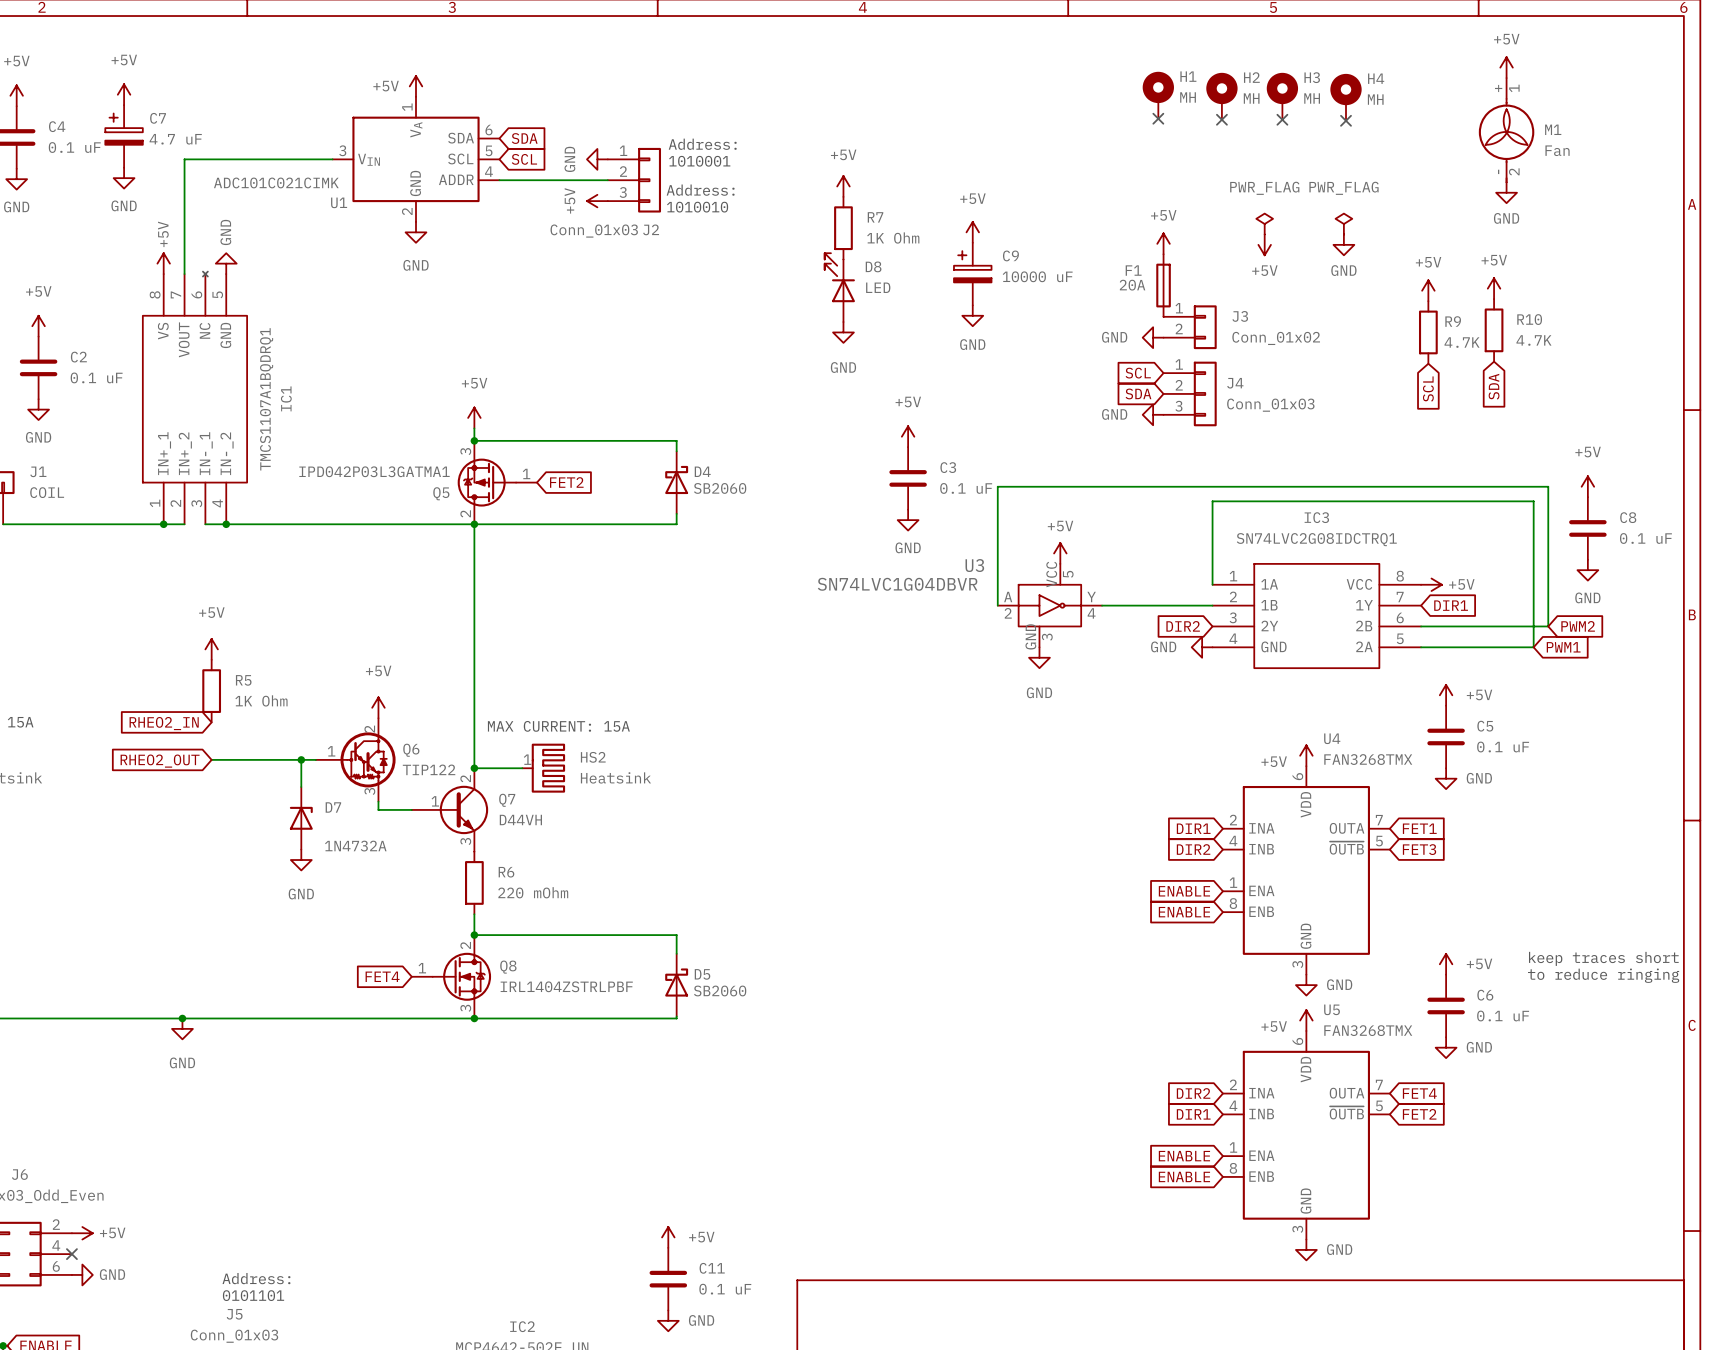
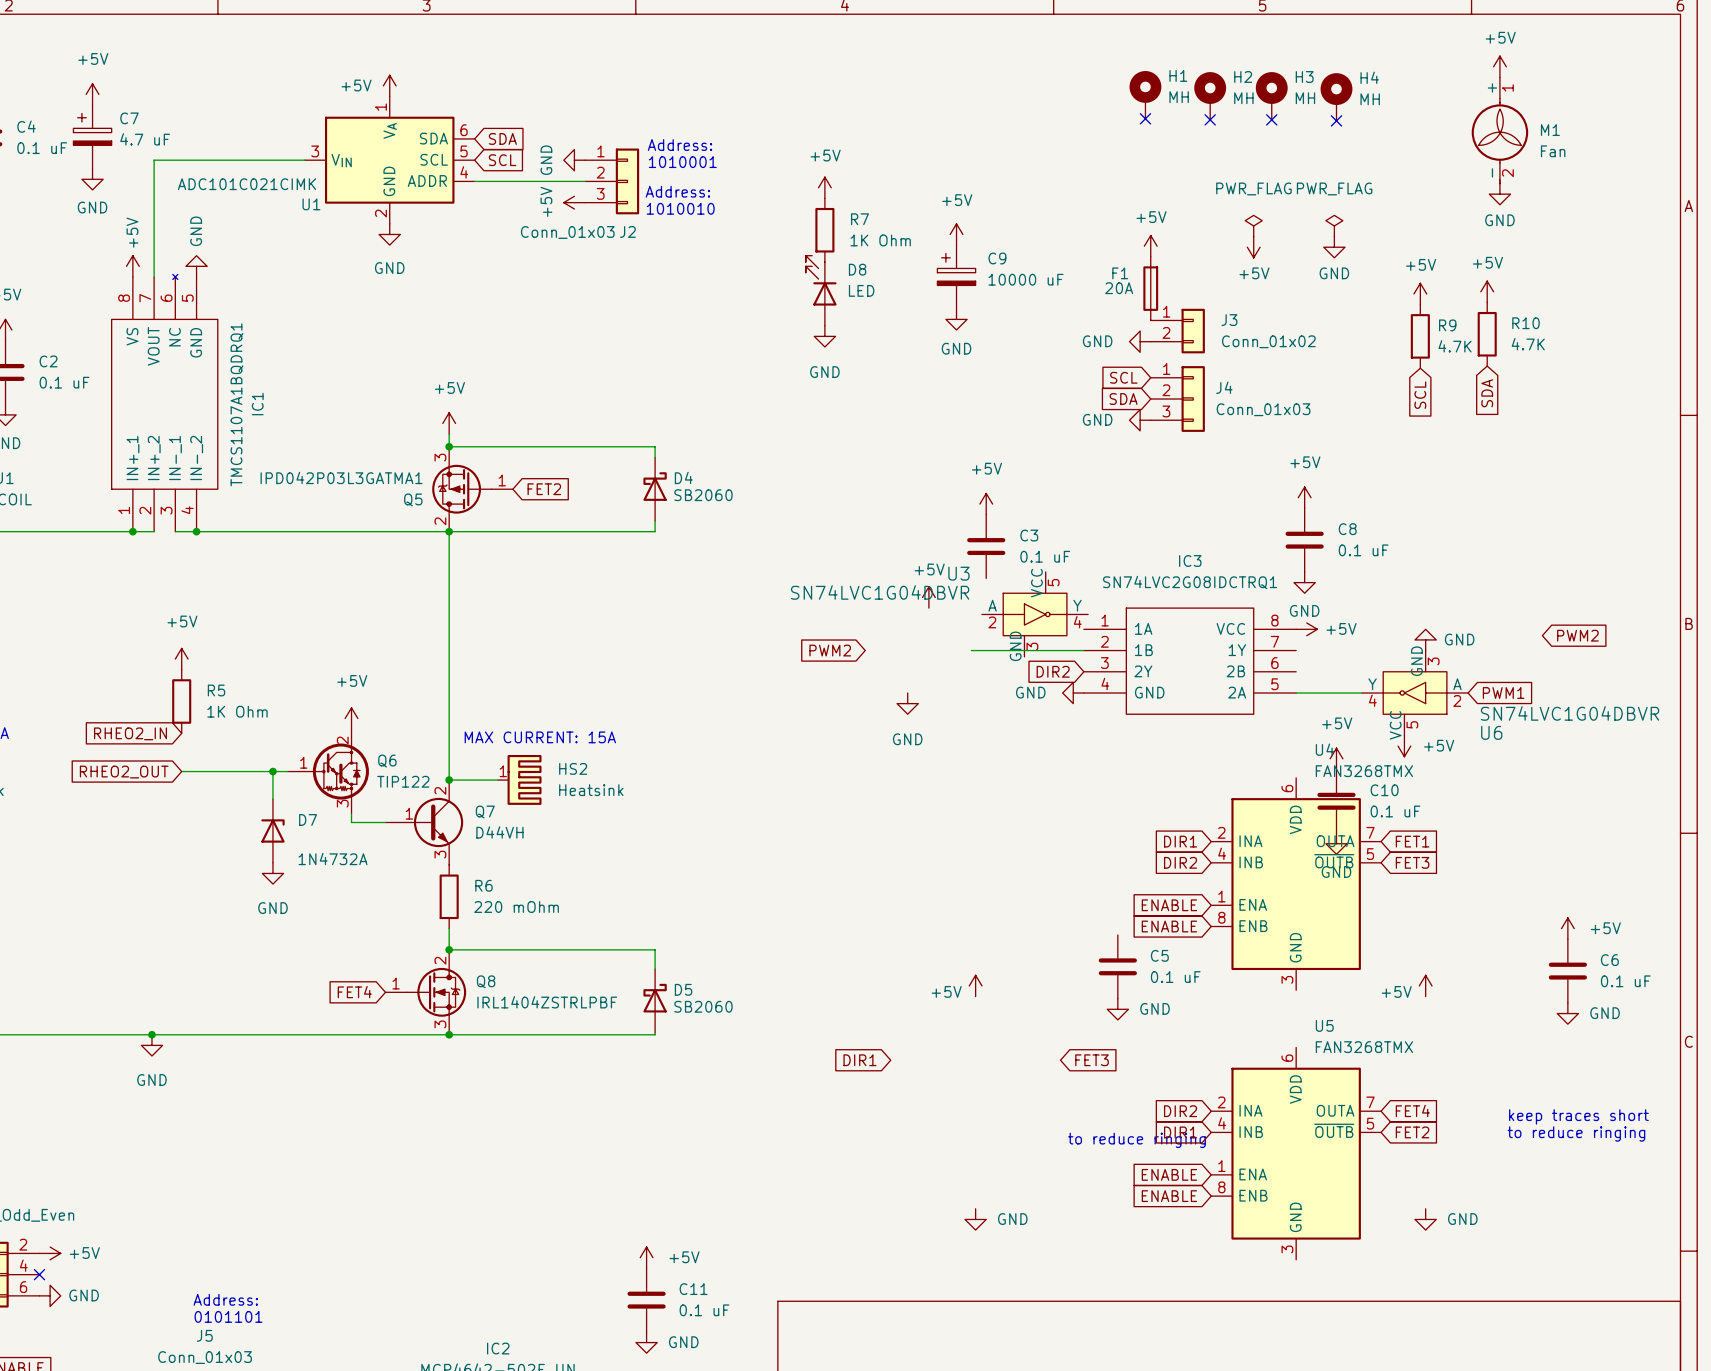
power symbol: +5V (908, 436) -> none
C3 position: (908, 478) -> (986, 546)
power symbol: +5V (1587, 486) -> none
power symbol: none -> +5V (1304, 497)
power symbol: none -> +5V (986, 504)
power symbol: GND (908, 520) -> none
C8 position: (1587, 528) -> (1304, 540)
power symbol: +5V (1060, 553) -> none
power symbol: GND (1587, 570) -> none
power symbol: none -> GND (1304, 582)
wire: (1212, 584) (1212, 501) (1533, 501) (1533, 647) (1421, 647) -> none
power symbol: +5V (1431, 584) -> none
power symbol: none -> +5V (928, 597)
wire: (997, 605) (997, 486) (1548, 486) (1548, 626) (1421, 626) -> none
wire: (1102, 605) (1212, 605) -> (971, 650) (1083, 650)
global label: DIR1 (1451, 605) -> none
IC3 position: (1316, 616) -> (1190, 661)
power symbol: none -> +5V (1306, 629)
global label position: DIR2 (1183, 626) -> DIR2 (1053, 671)
power symbol: none -> GND (1425, 639)
global label: none -> PWM2 (830, 650)
power symbol: GND (1202, 647) -> none
global label position: PWM1 (1563, 647) -> PWM1 (1503, 693)
power symbol rotation: 0° (1039, 657) -> 90° clockwise (1073, 693)
power symbol position: GND (1039, 657) -> GND (1073, 693)
wire: none -> (1296, 693) (1361, 693)
U6: none -> SN74LVC1G04DBVR (1415, 693)
power symbol: none -> GND (907, 703)
power symbol rotation: 0° (1446, 695) -> 180° (1404, 746)
power symbol position: +5V (1446, 695) -> +5V (1404, 746)
C5 position: (1446, 736) -> (1117, 966)
power symbol position: +5V (1306, 755) -> +5V (1336, 758)
power symbol text position: +5V (1274, 761) -> +5V (1337, 723)
power symbol: GND (1446, 778) -> none
C10: none -> 0.1 uF (1336, 801)
power symbol: none -> GND (1336, 843)
power symbol: none -> +5V (1567, 928)
text position: keep traces short (1603, 958) -> keep traces short (1578, 1116)
power symbol text position: +5V (1479, 963) -> +5V (1396, 991)
power symbol position: +5V (1446, 964) -> +5V (1425, 985)
power symbol: none -> +5V (975, 985)
text position: to reduce ringing (1603, 975) -> to reduce ringing (1576, 1133)
power symbol: GND (1306, 985) -> none
power symbol: none -> GND (1117, 1009)
power symbol: none -> GND (1567, 1013)
C6 position: (1446, 1005) -> (1567, 971)
power symbol: +5V (1306, 1020) -> none
global label: none -> DIR1 (859, 1060)
global label: none -> FET3 (1092, 1060)
power symbol: GND (1446, 1047) -> none
text: none -> to reduce ringing (1136, 1140)
power symbol: none -> GND (975, 1219)
power symbol: none -> GND (1425, 1219)
power symbol: GND (1306, 1249) -> none

